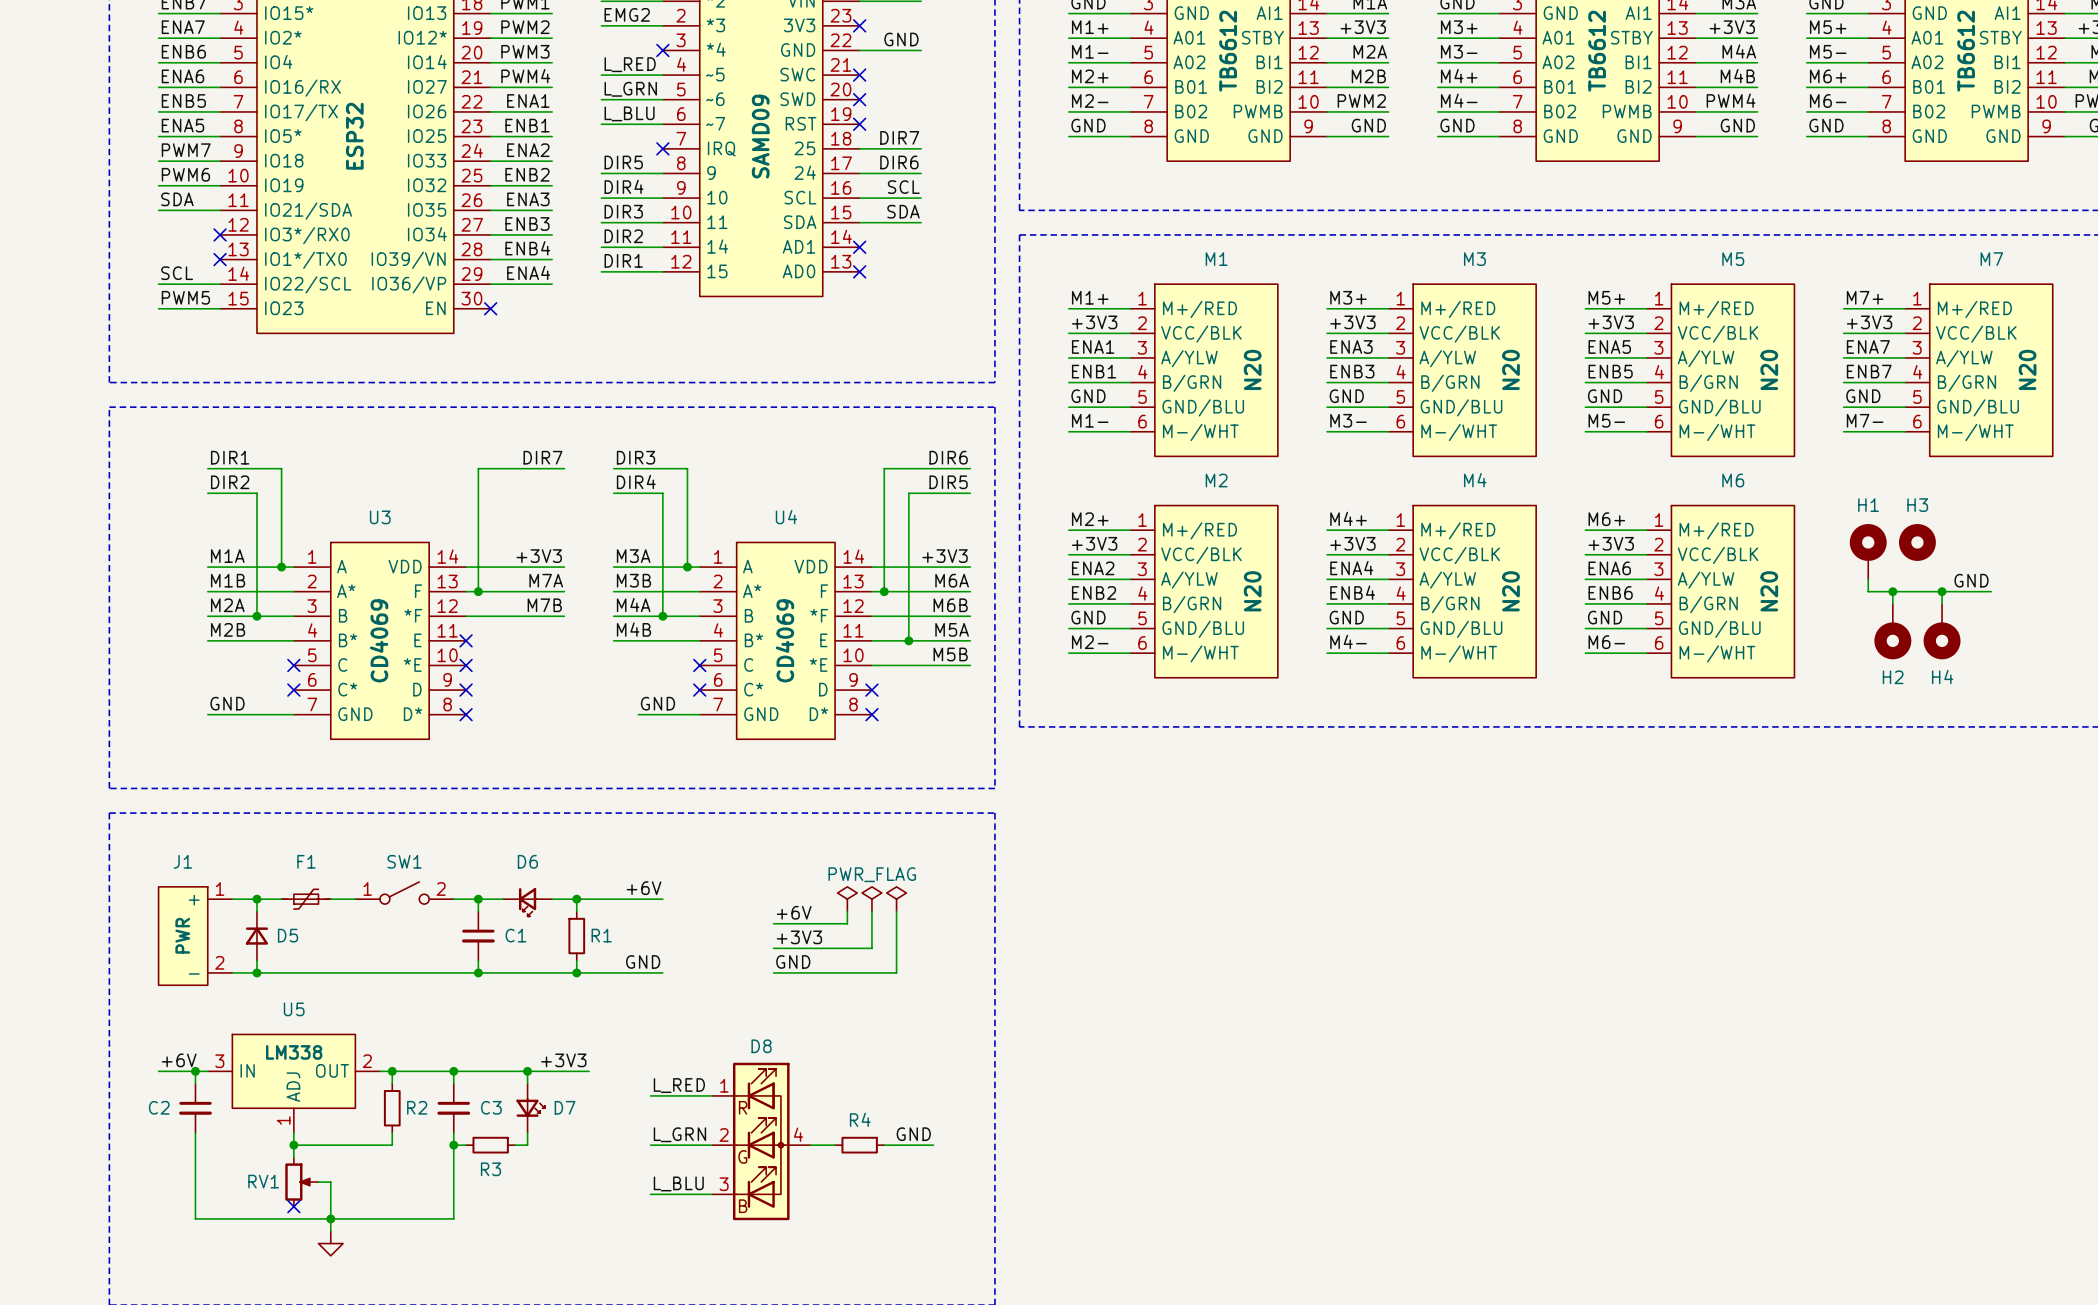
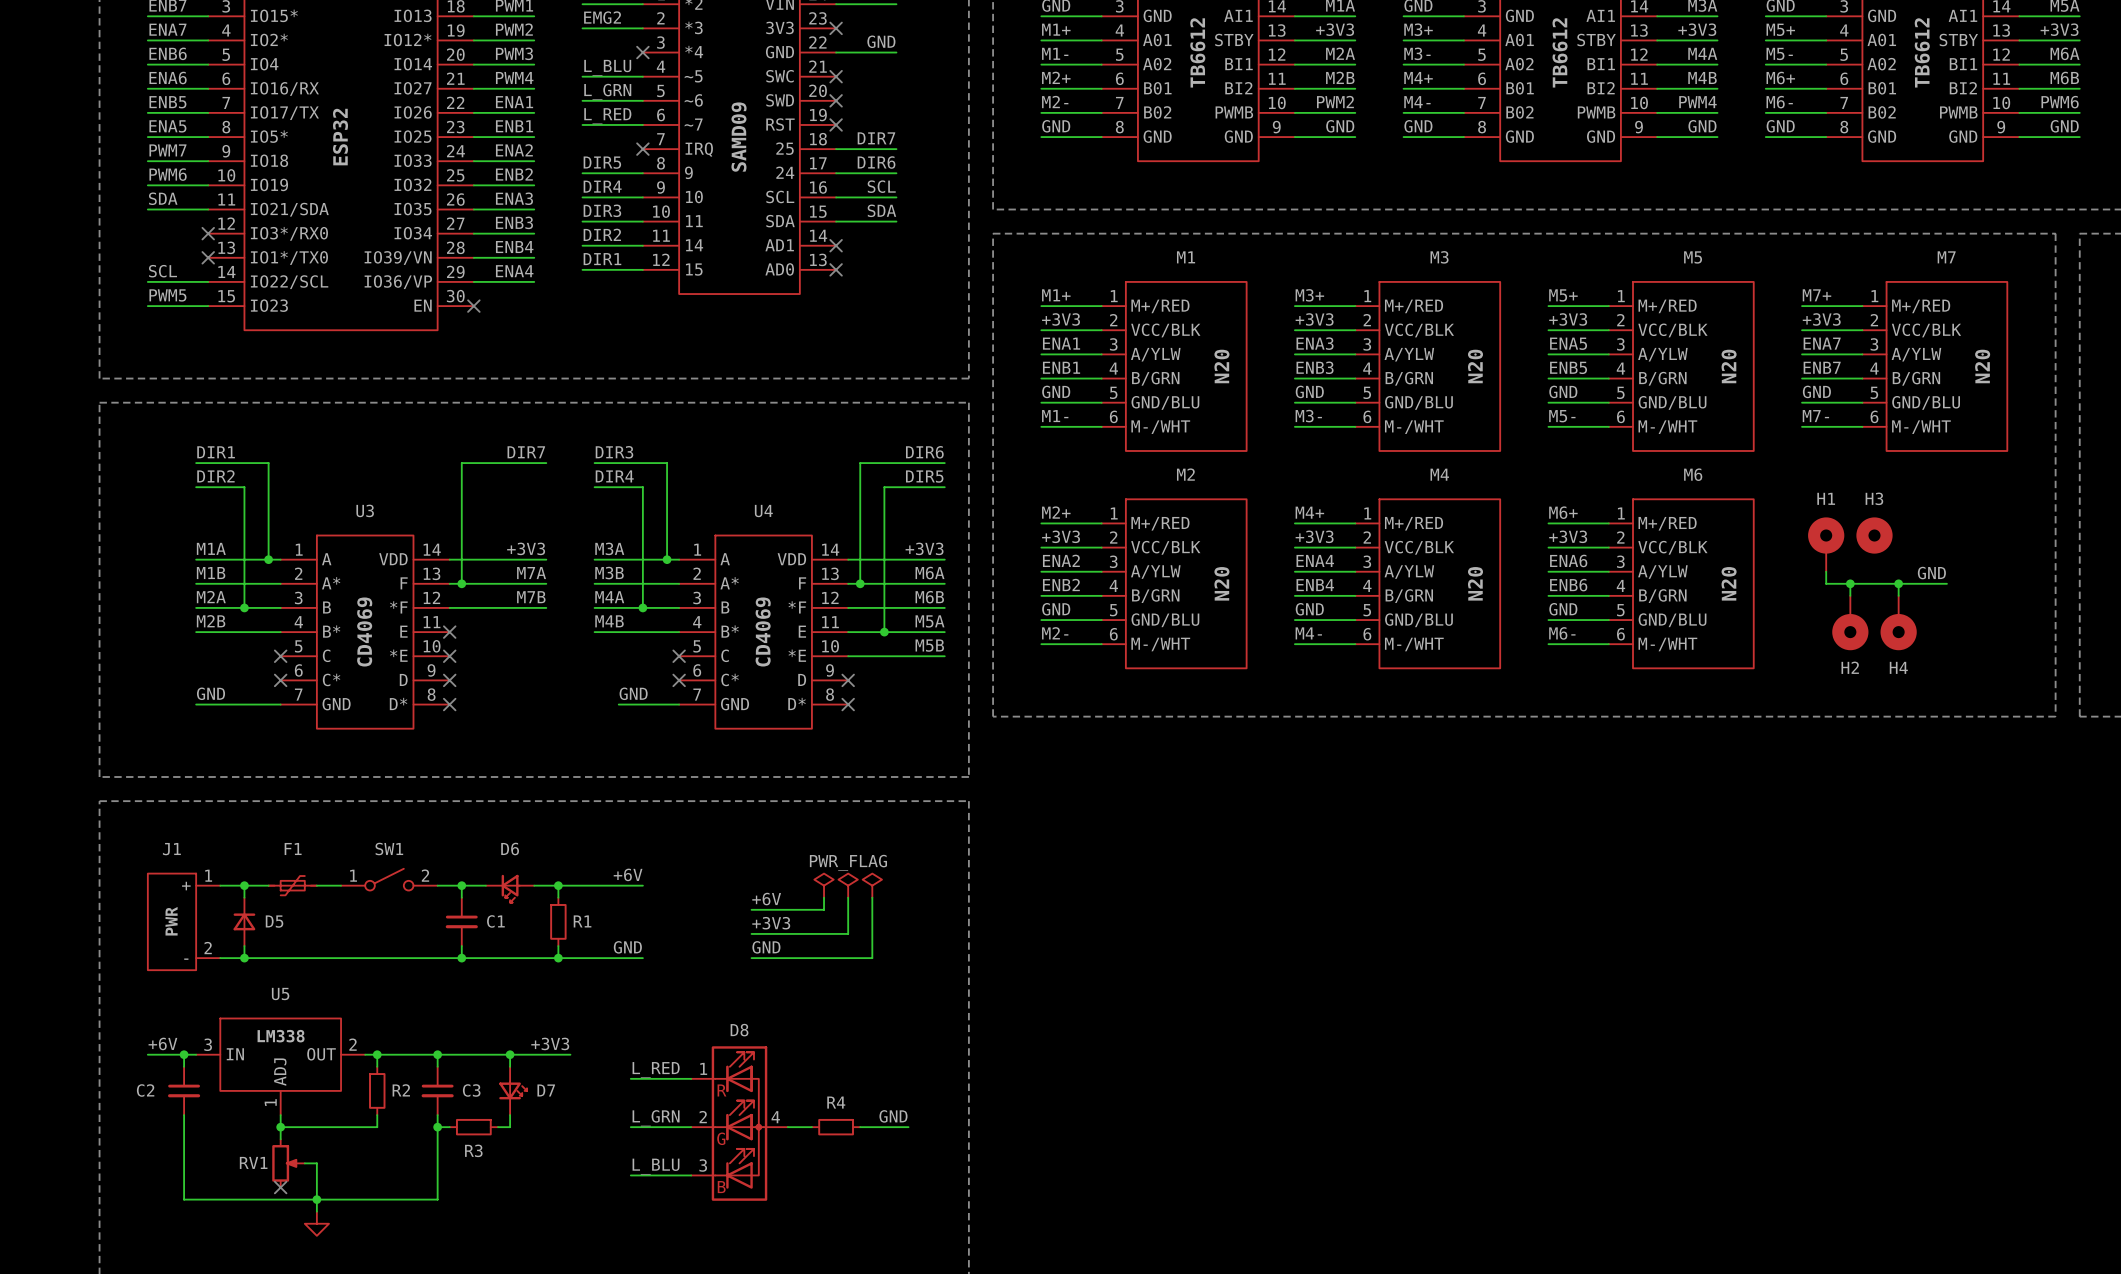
label: L_RED (630, 64) -> L_BLU (607, 67)
label: L_BLU (629, 113) -> L_RED (607, 116)

